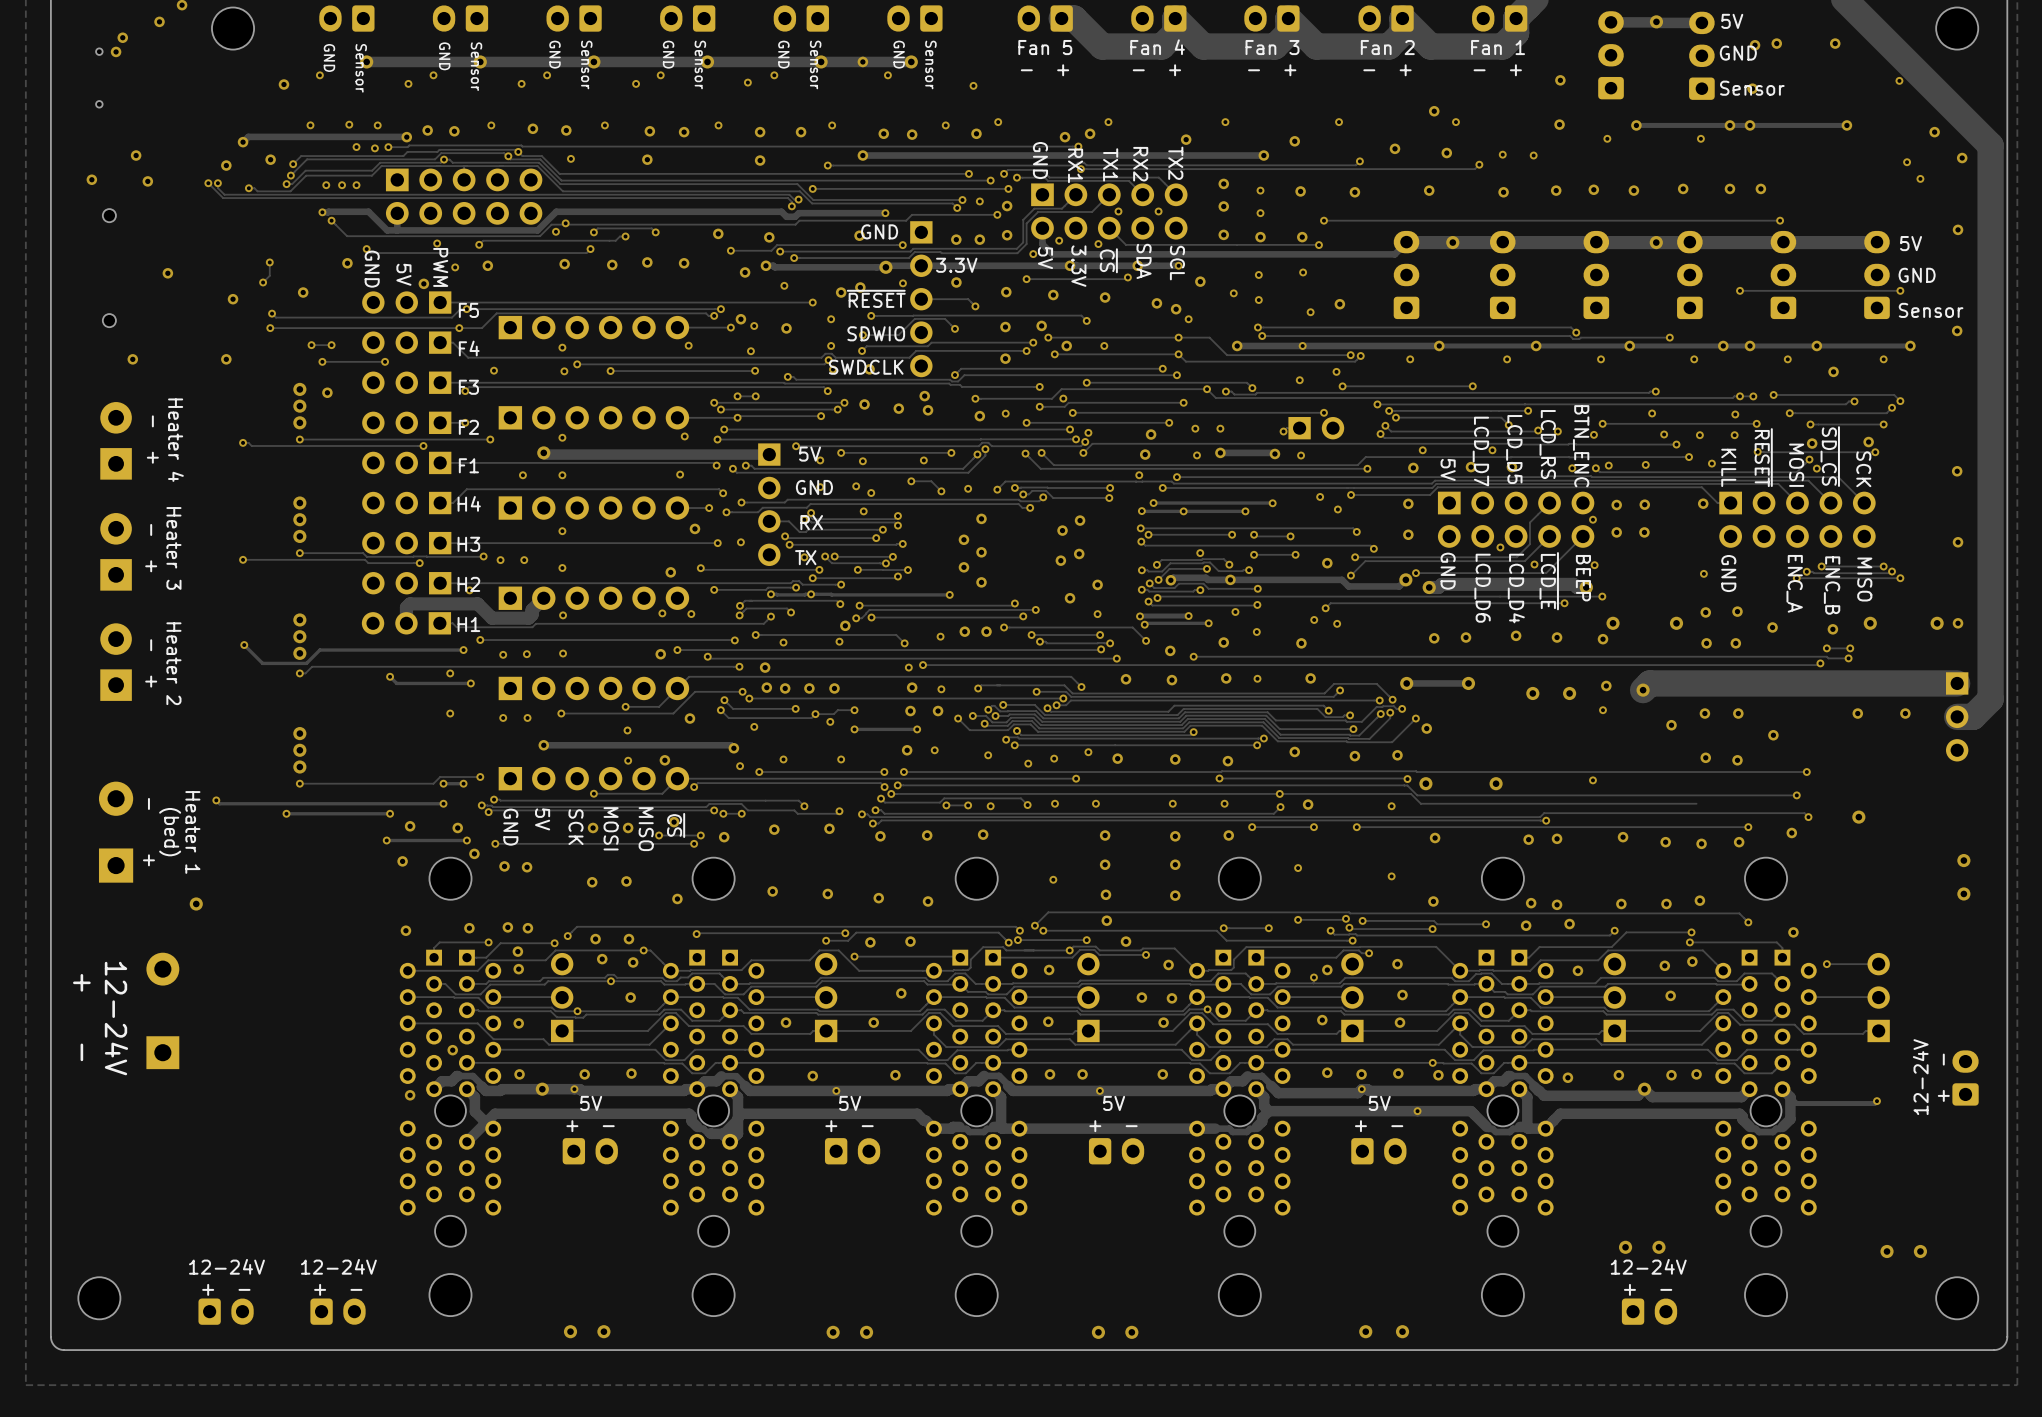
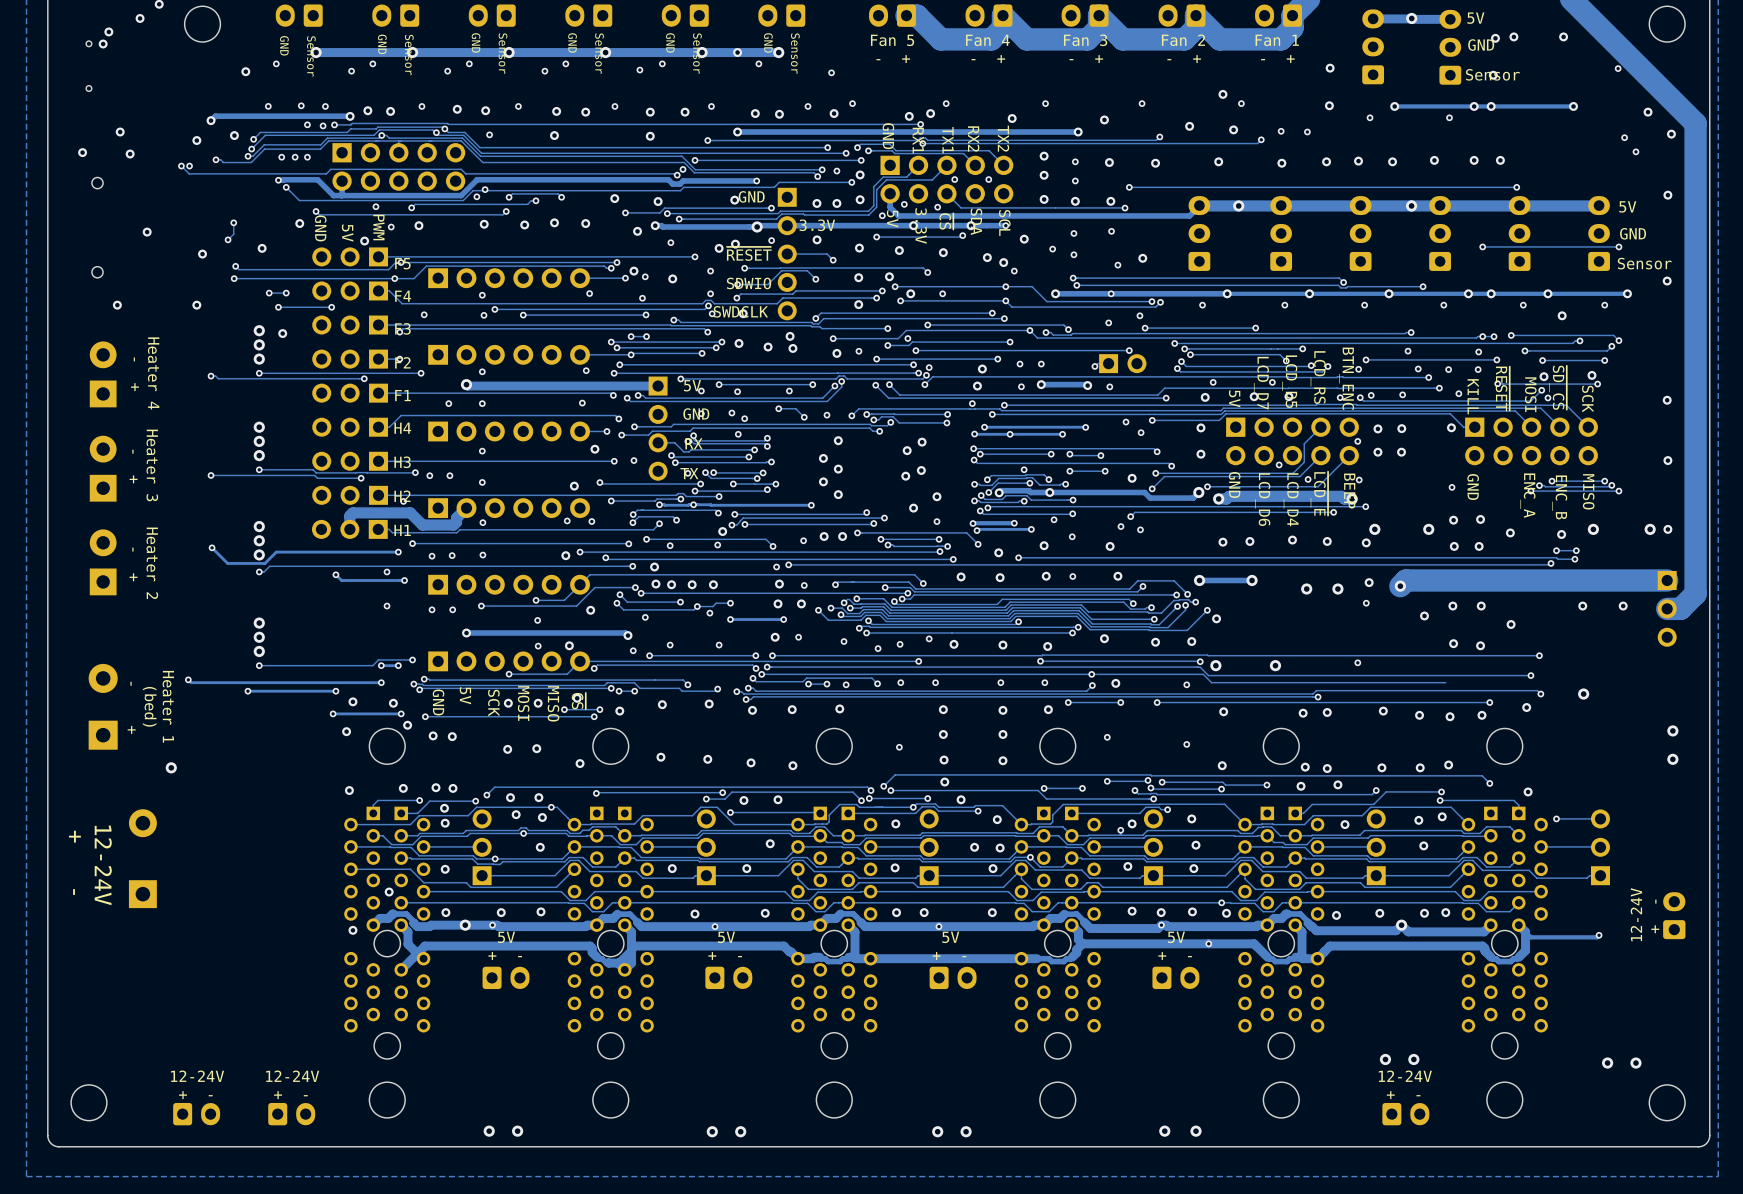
track: (208, 183) (223, 198) (787, 198) (791, 201) (791, 206) -> none
via: (208, 183) -> none
track: (217, 183) (217, 188) (224, 194) (789, 194) (794, 199) (798, 199) -> none
via: (217, 183) -> none
track: none -> (181, 166) (189, 173) (326, 173) (330, 169) (461, 169) (465, 173) (673, 173) (676, 176)
via: none -> (181, 166)
via: none -> (189, 166)

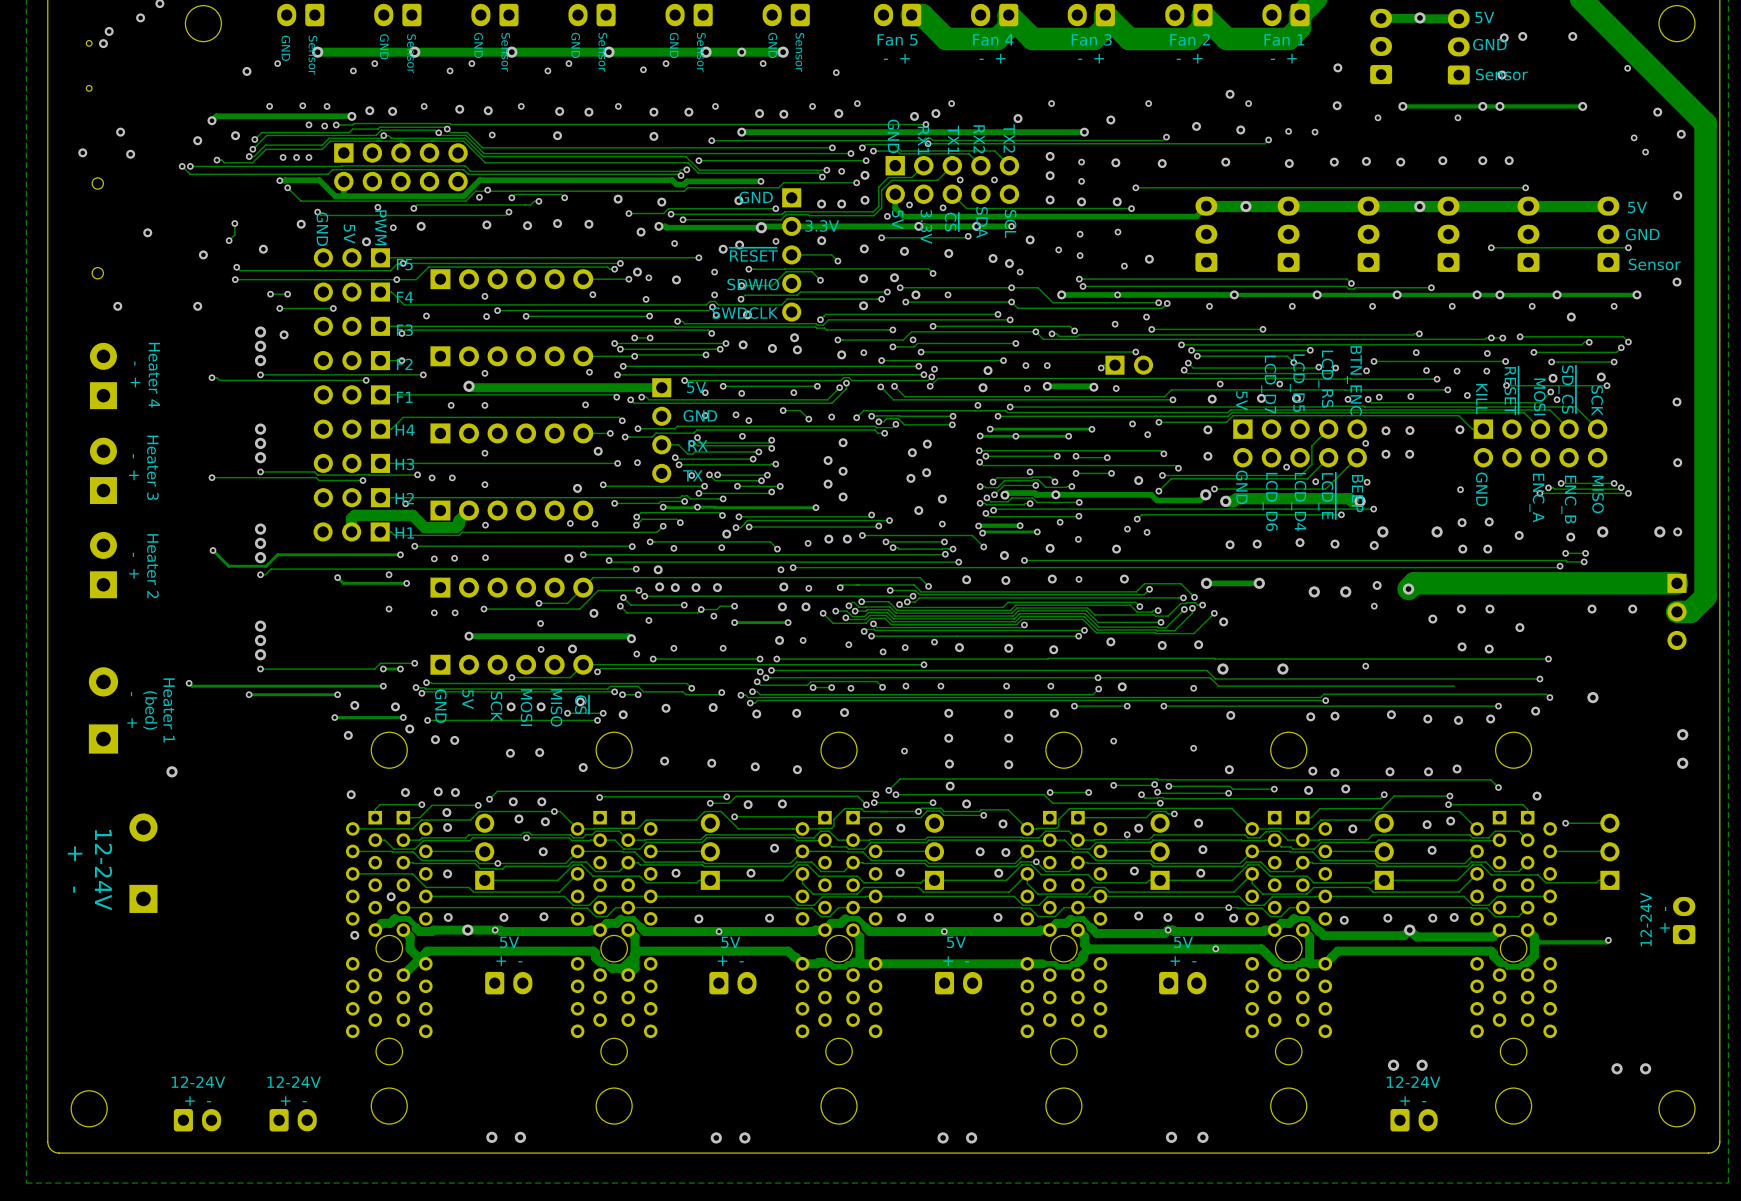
track: none -> (190, 166) (465, 165) (470, 171) (679, 171) (684, 169) (687, 172)
track: (1040, 661) (1200, 661) -> none
via: (1040, 661) -> none
via: (1200, 661) -> none

